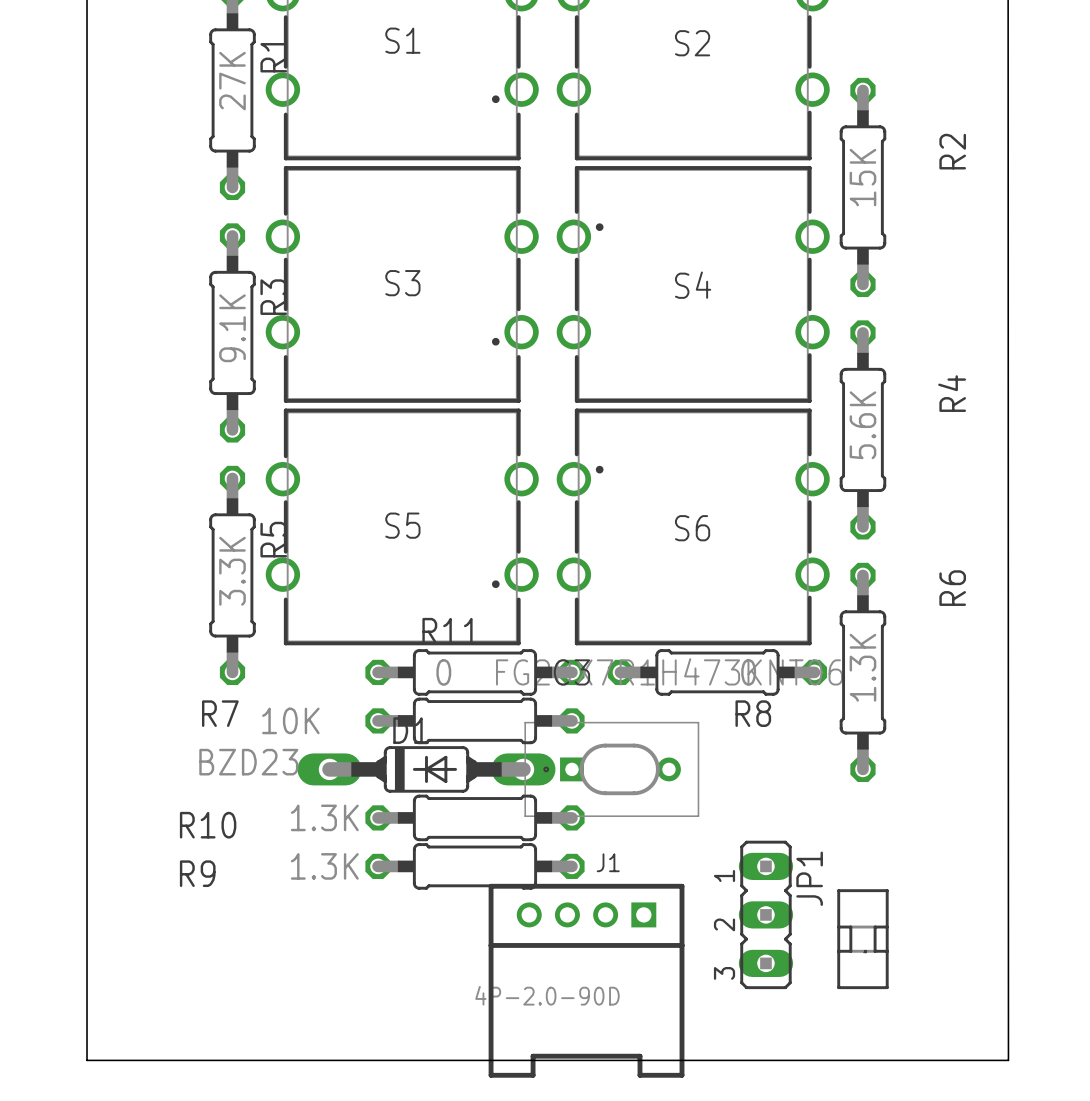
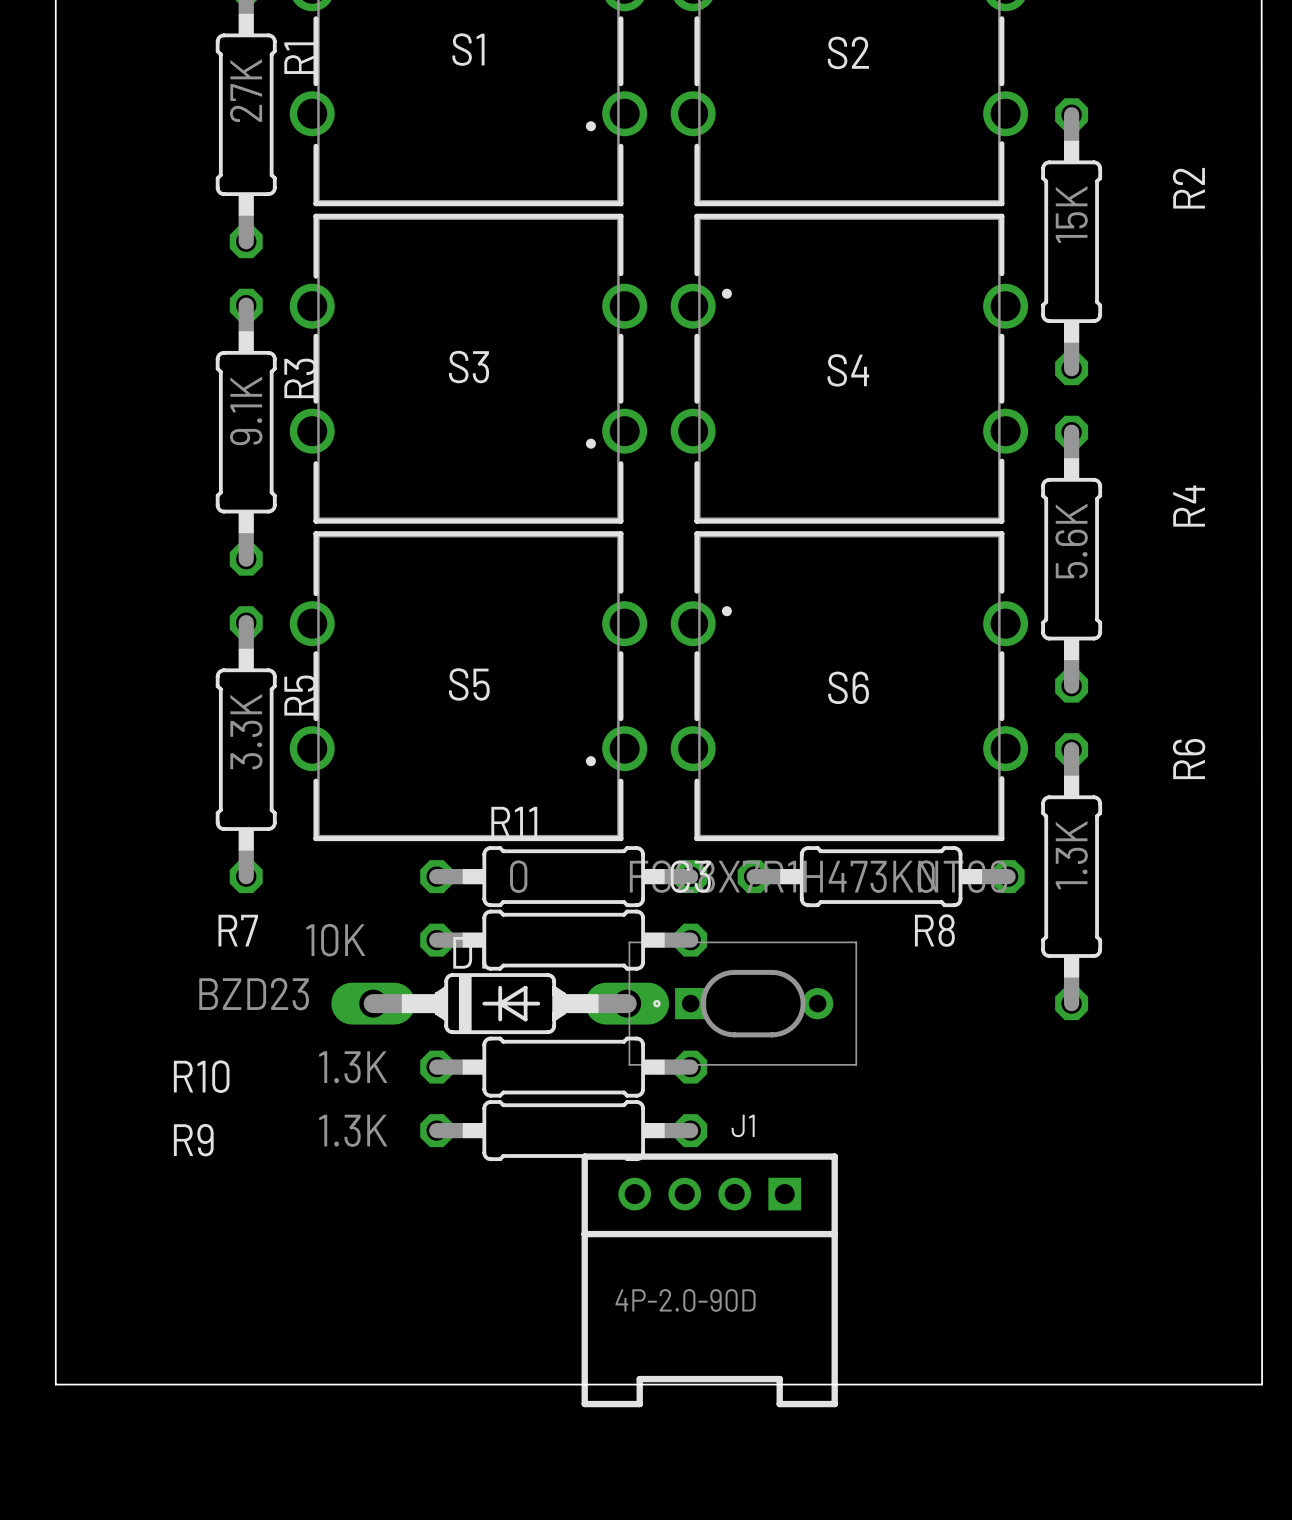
JP1: (765, 914) -> none
part: (862, 939) -> none

